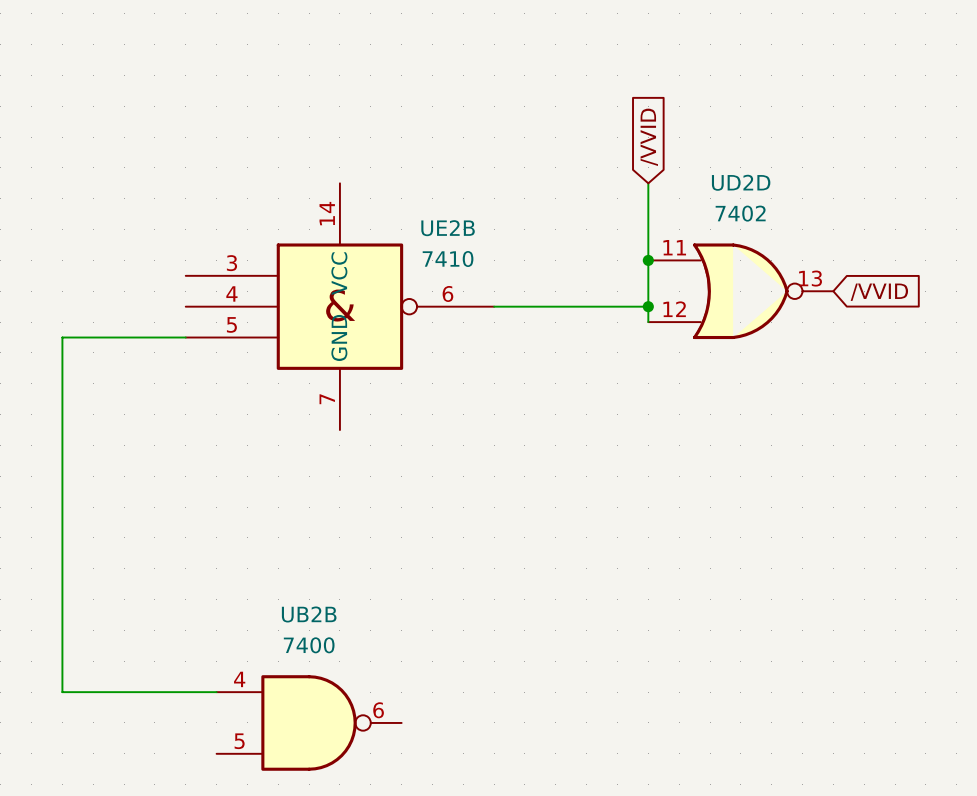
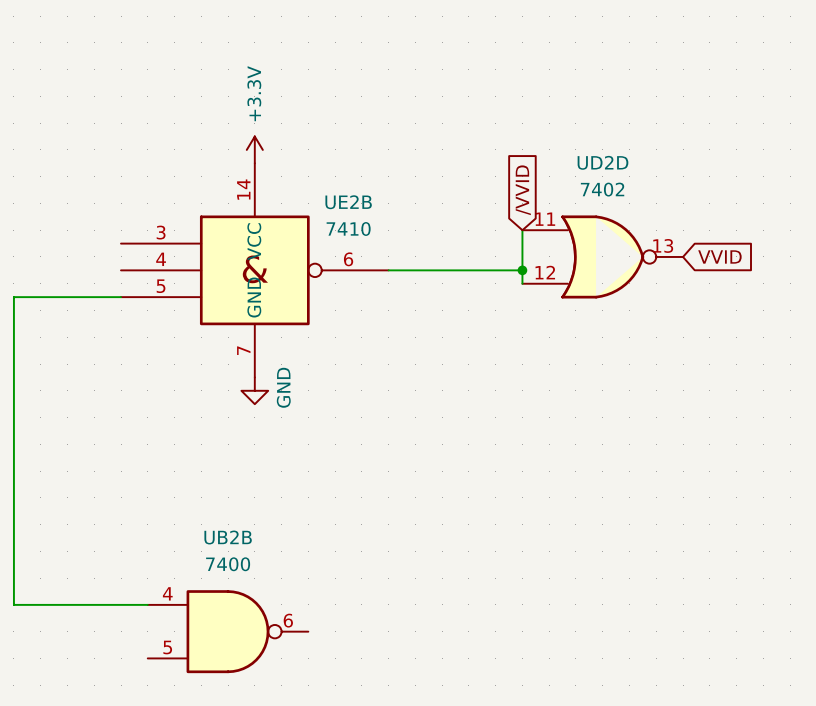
global label position: /VVID (649, 137) -> /VVID (523, 190)
power symbol: none -> +3.3V (254, 149)
wire: (648, 183) (648, 260) -> none
junction: (648, 260) -> none
global label: /VVID (879, 292) -> VVID (719, 256)
power symbol: none -> GND (254, 390)

